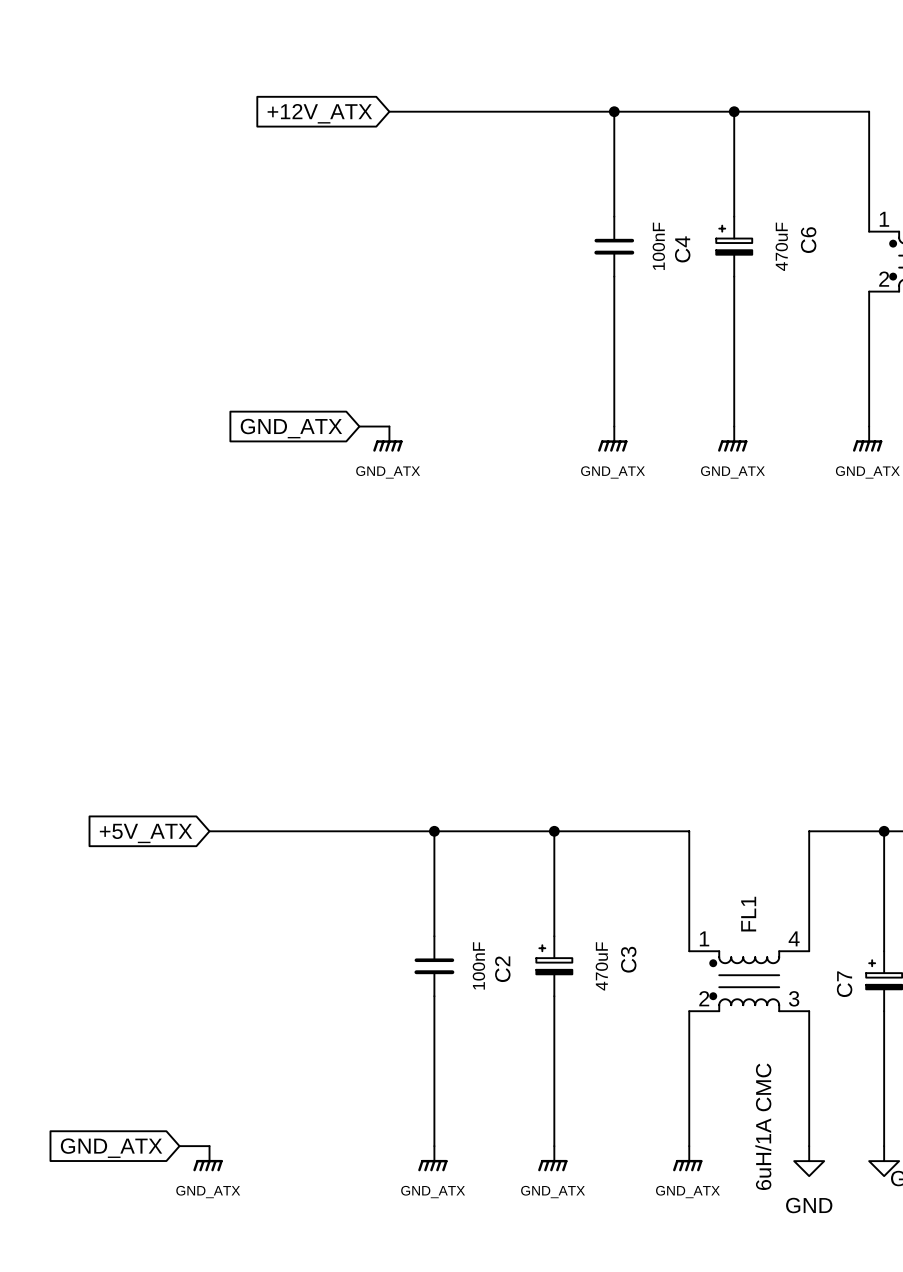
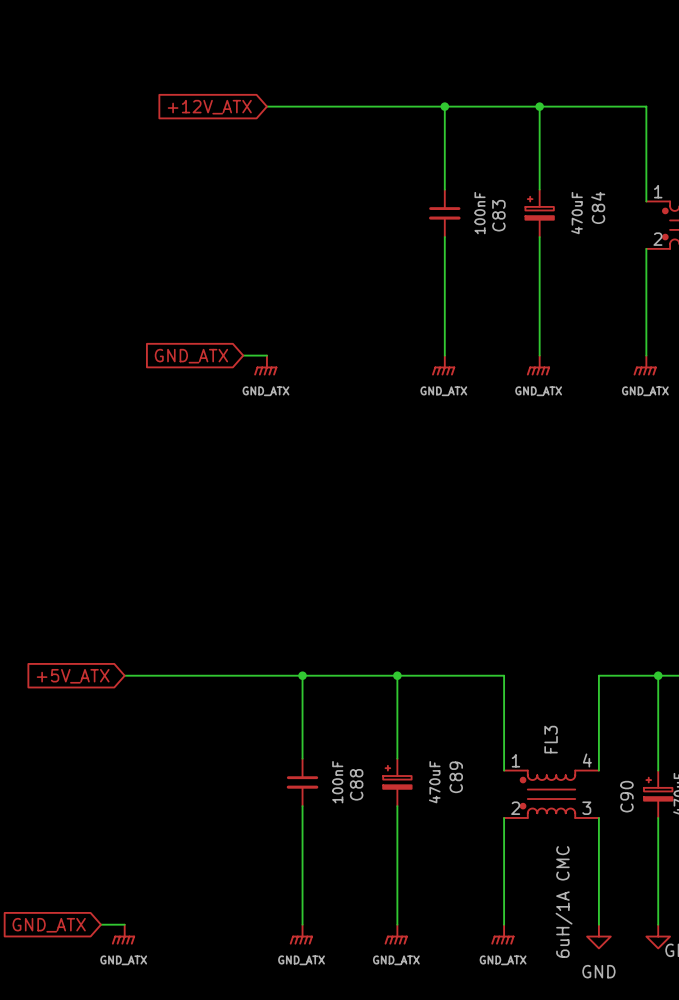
C6 name: C6 (808, 240) -> C84 (598, 207)
C4 name: C4 (682, 249) -> C83 (498, 215)
FL1 name: FL1 (748, 914) -> FL3 (551, 739)
C3 name: C3 (628, 959) -> C89 (456, 777)
C2 name: C2 (502, 969) -> C88 (356, 784)
C7 name: C7 (844, 984) -> C90 (626, 796)

